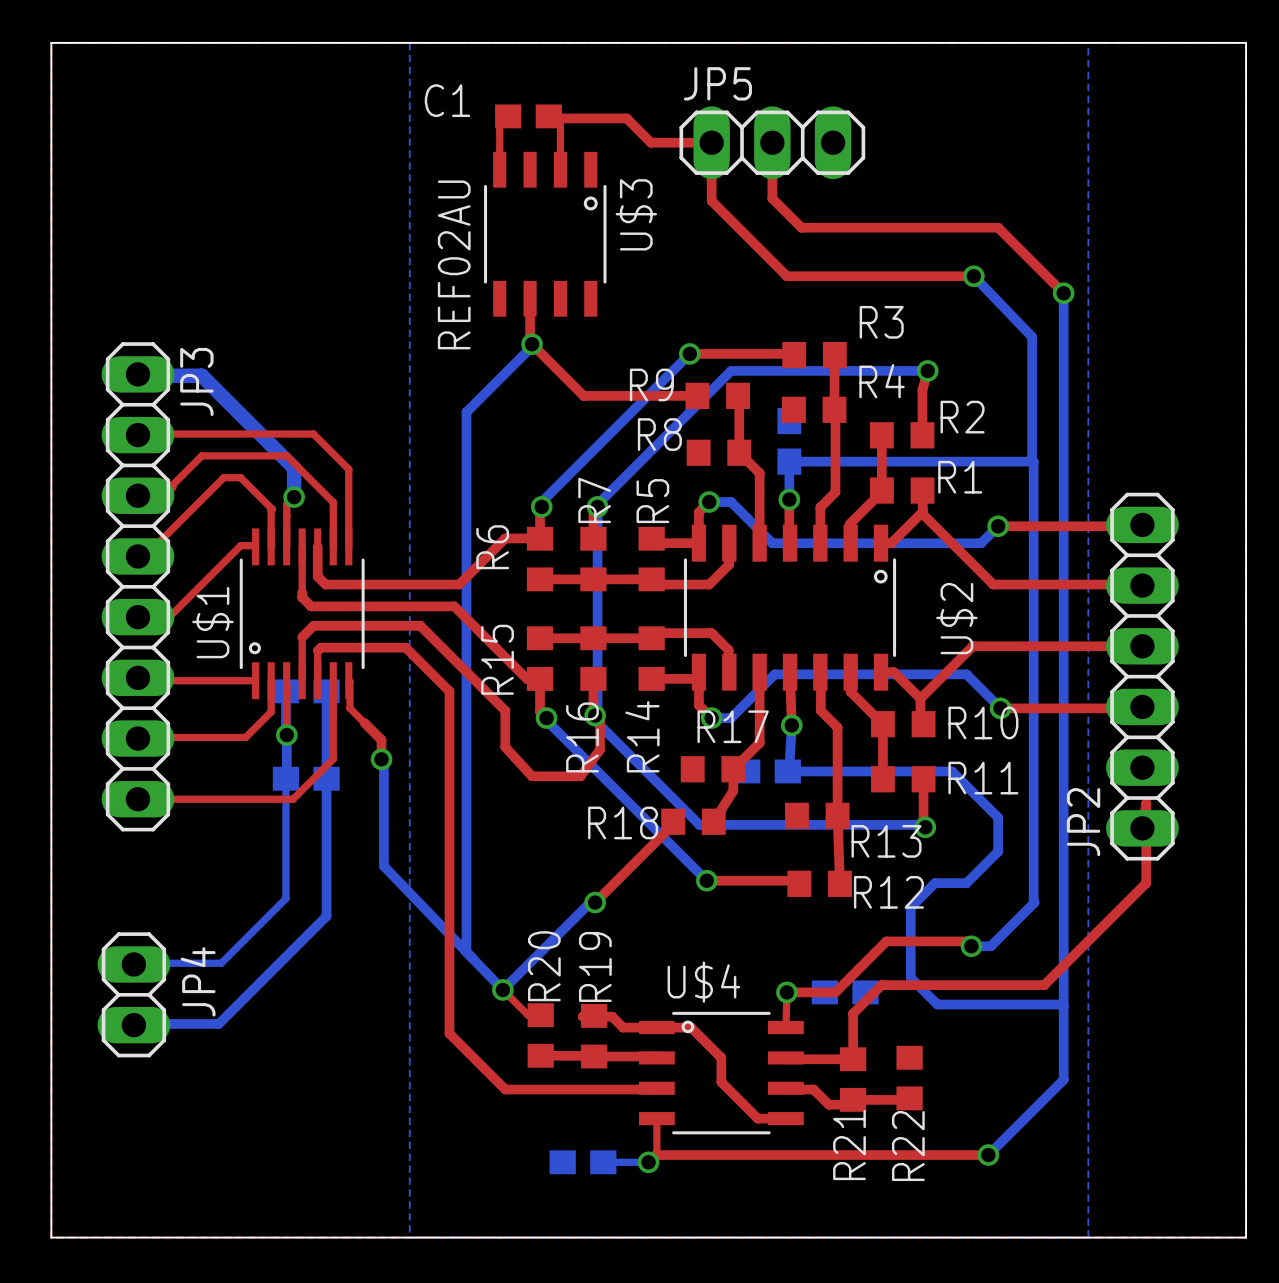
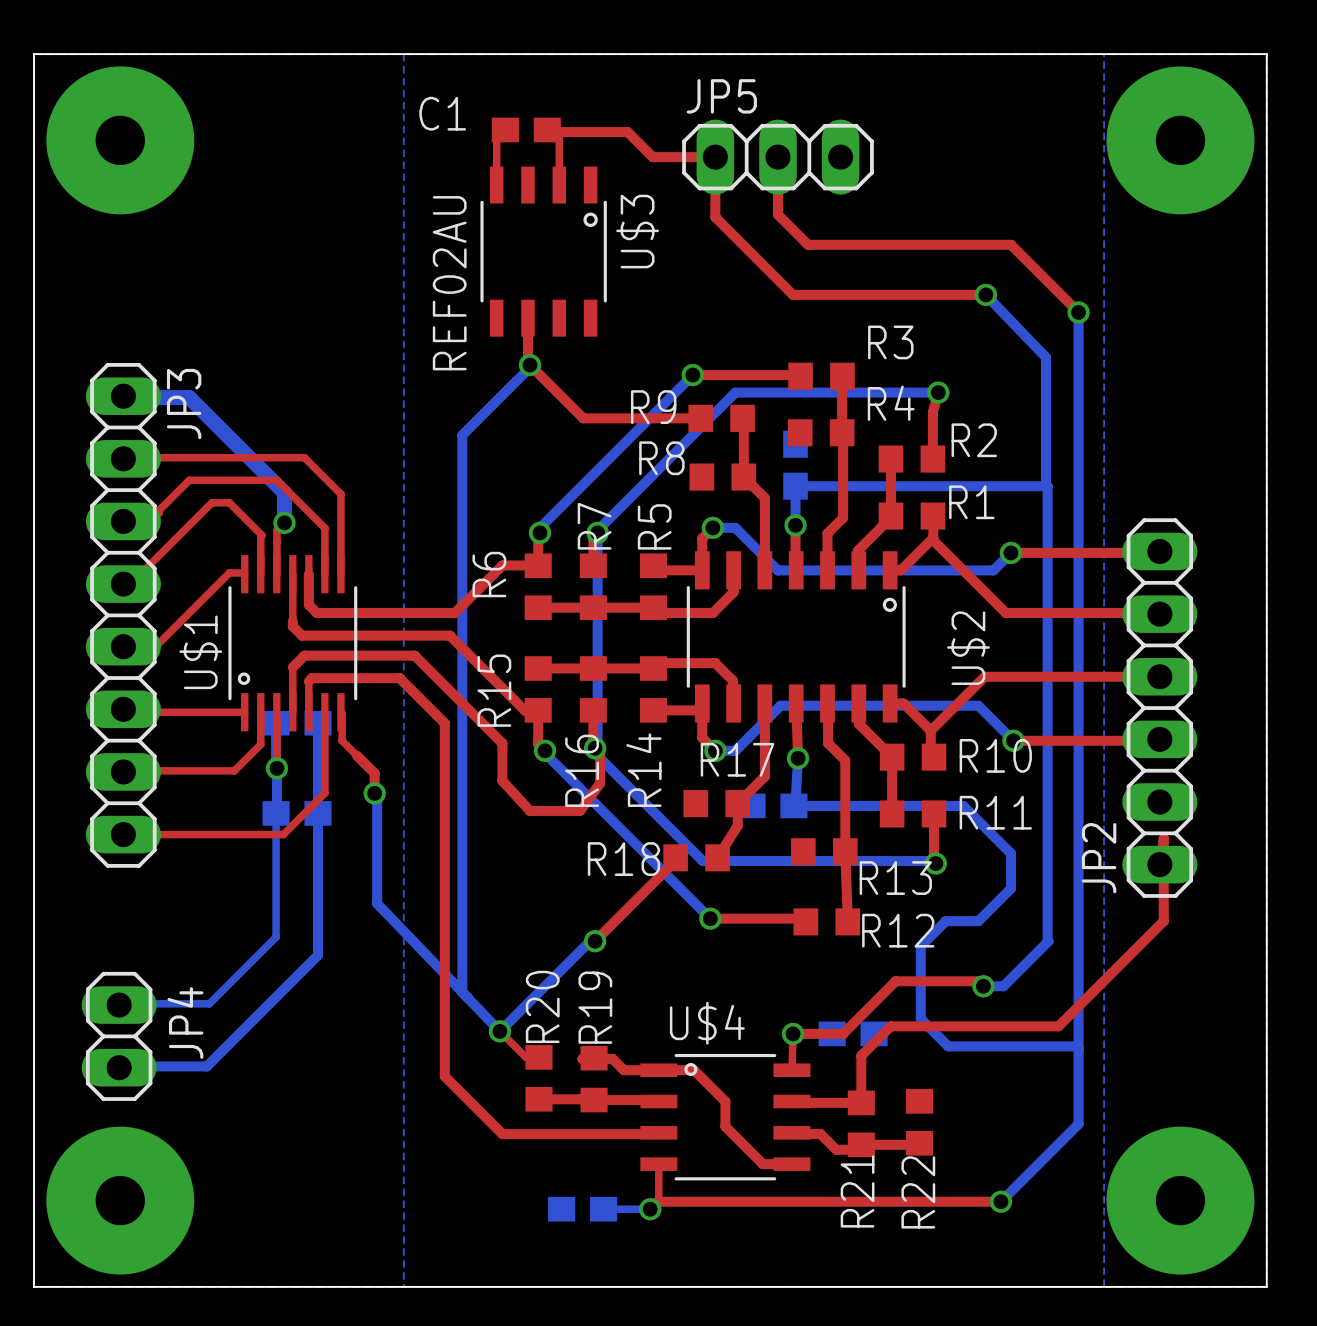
via: none -> (120, 140)
via: none -> (1180, 140)
via: none -> (120, 1200)
via: none -> (1180, 1200)

